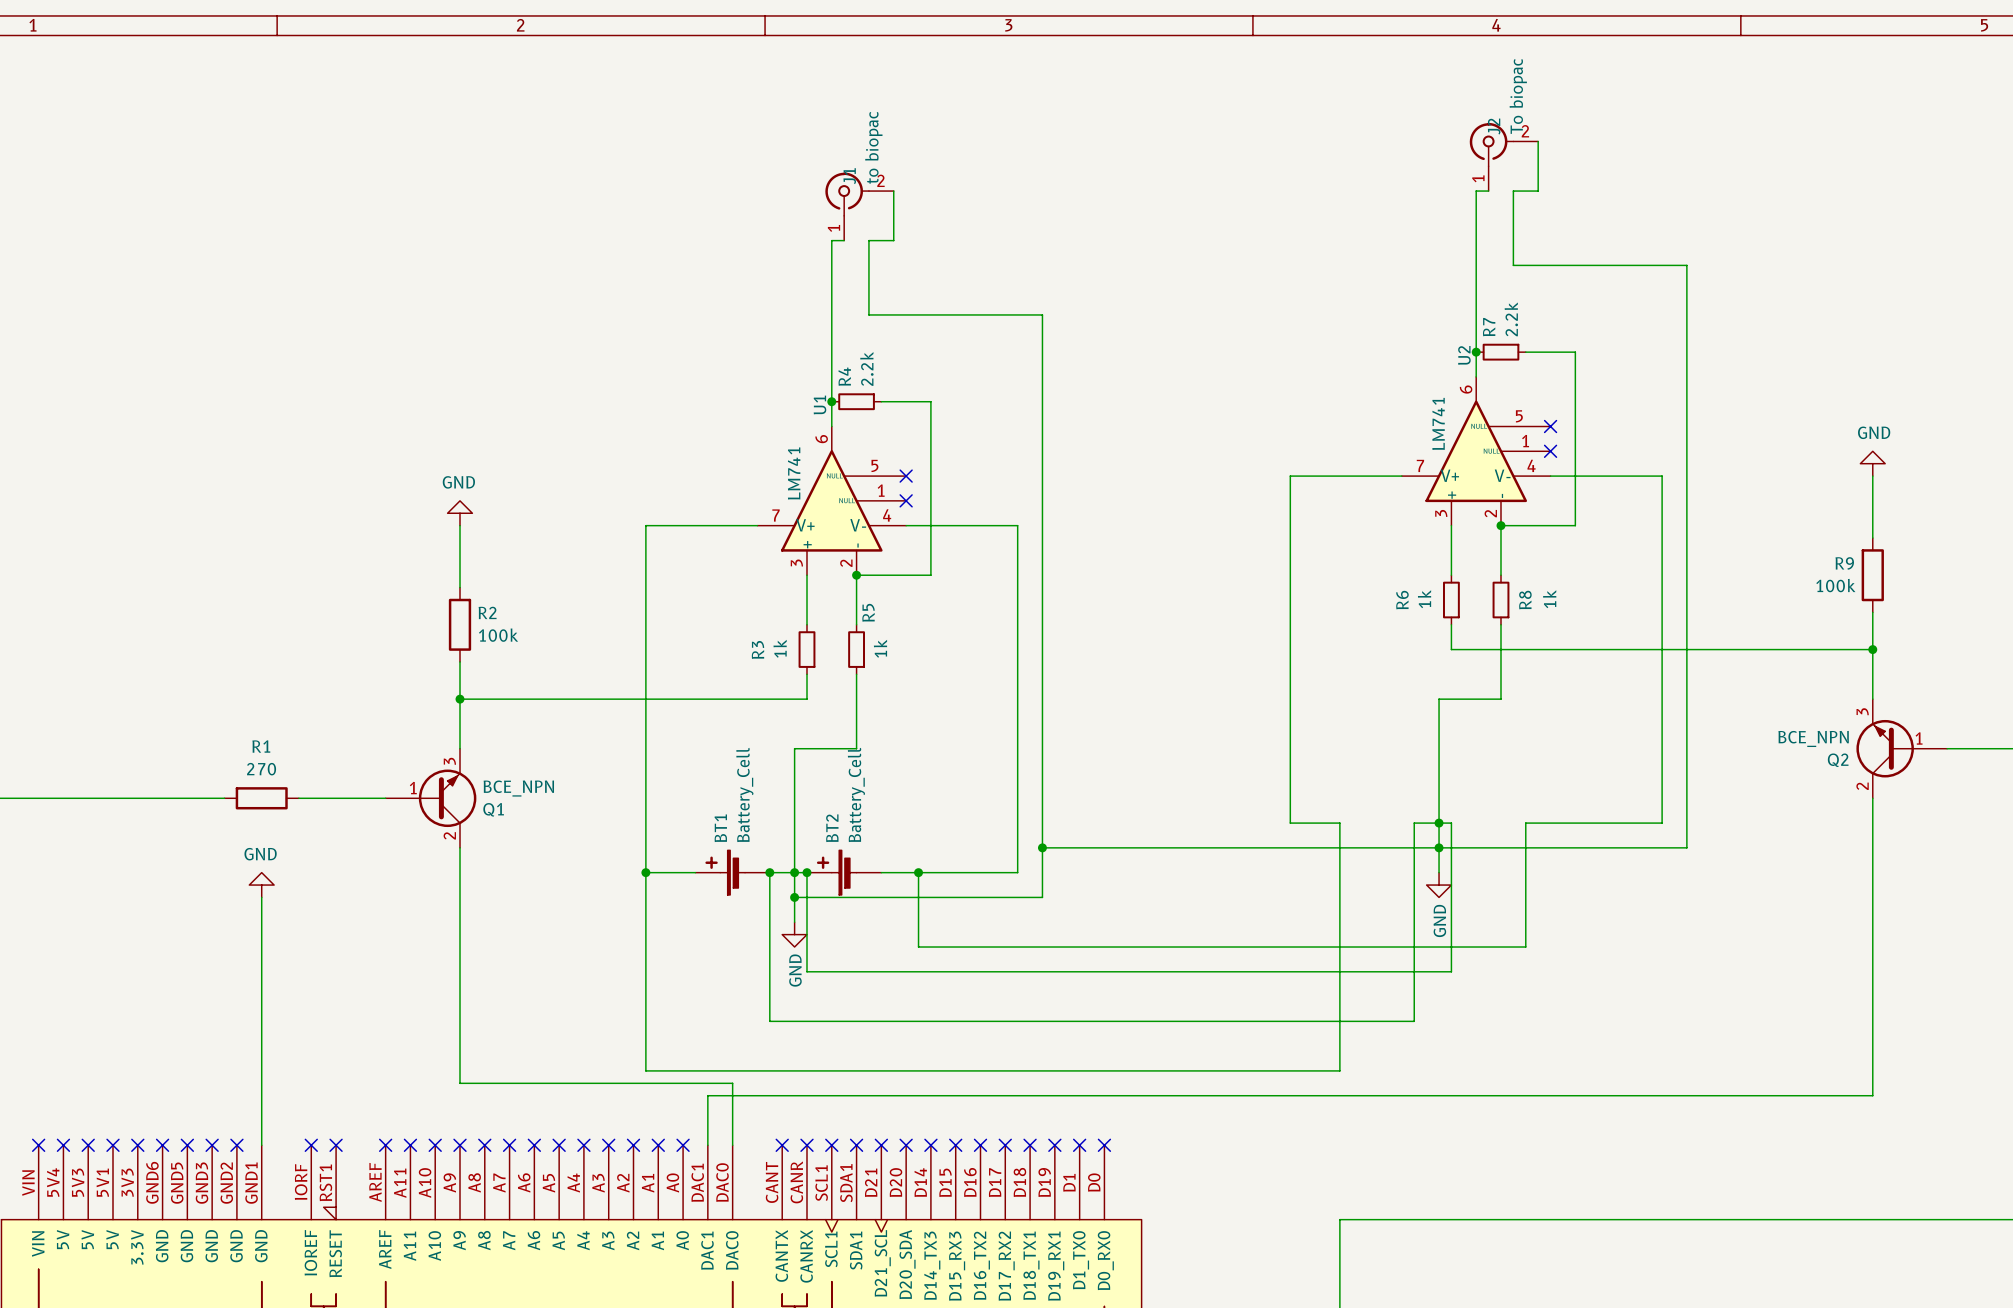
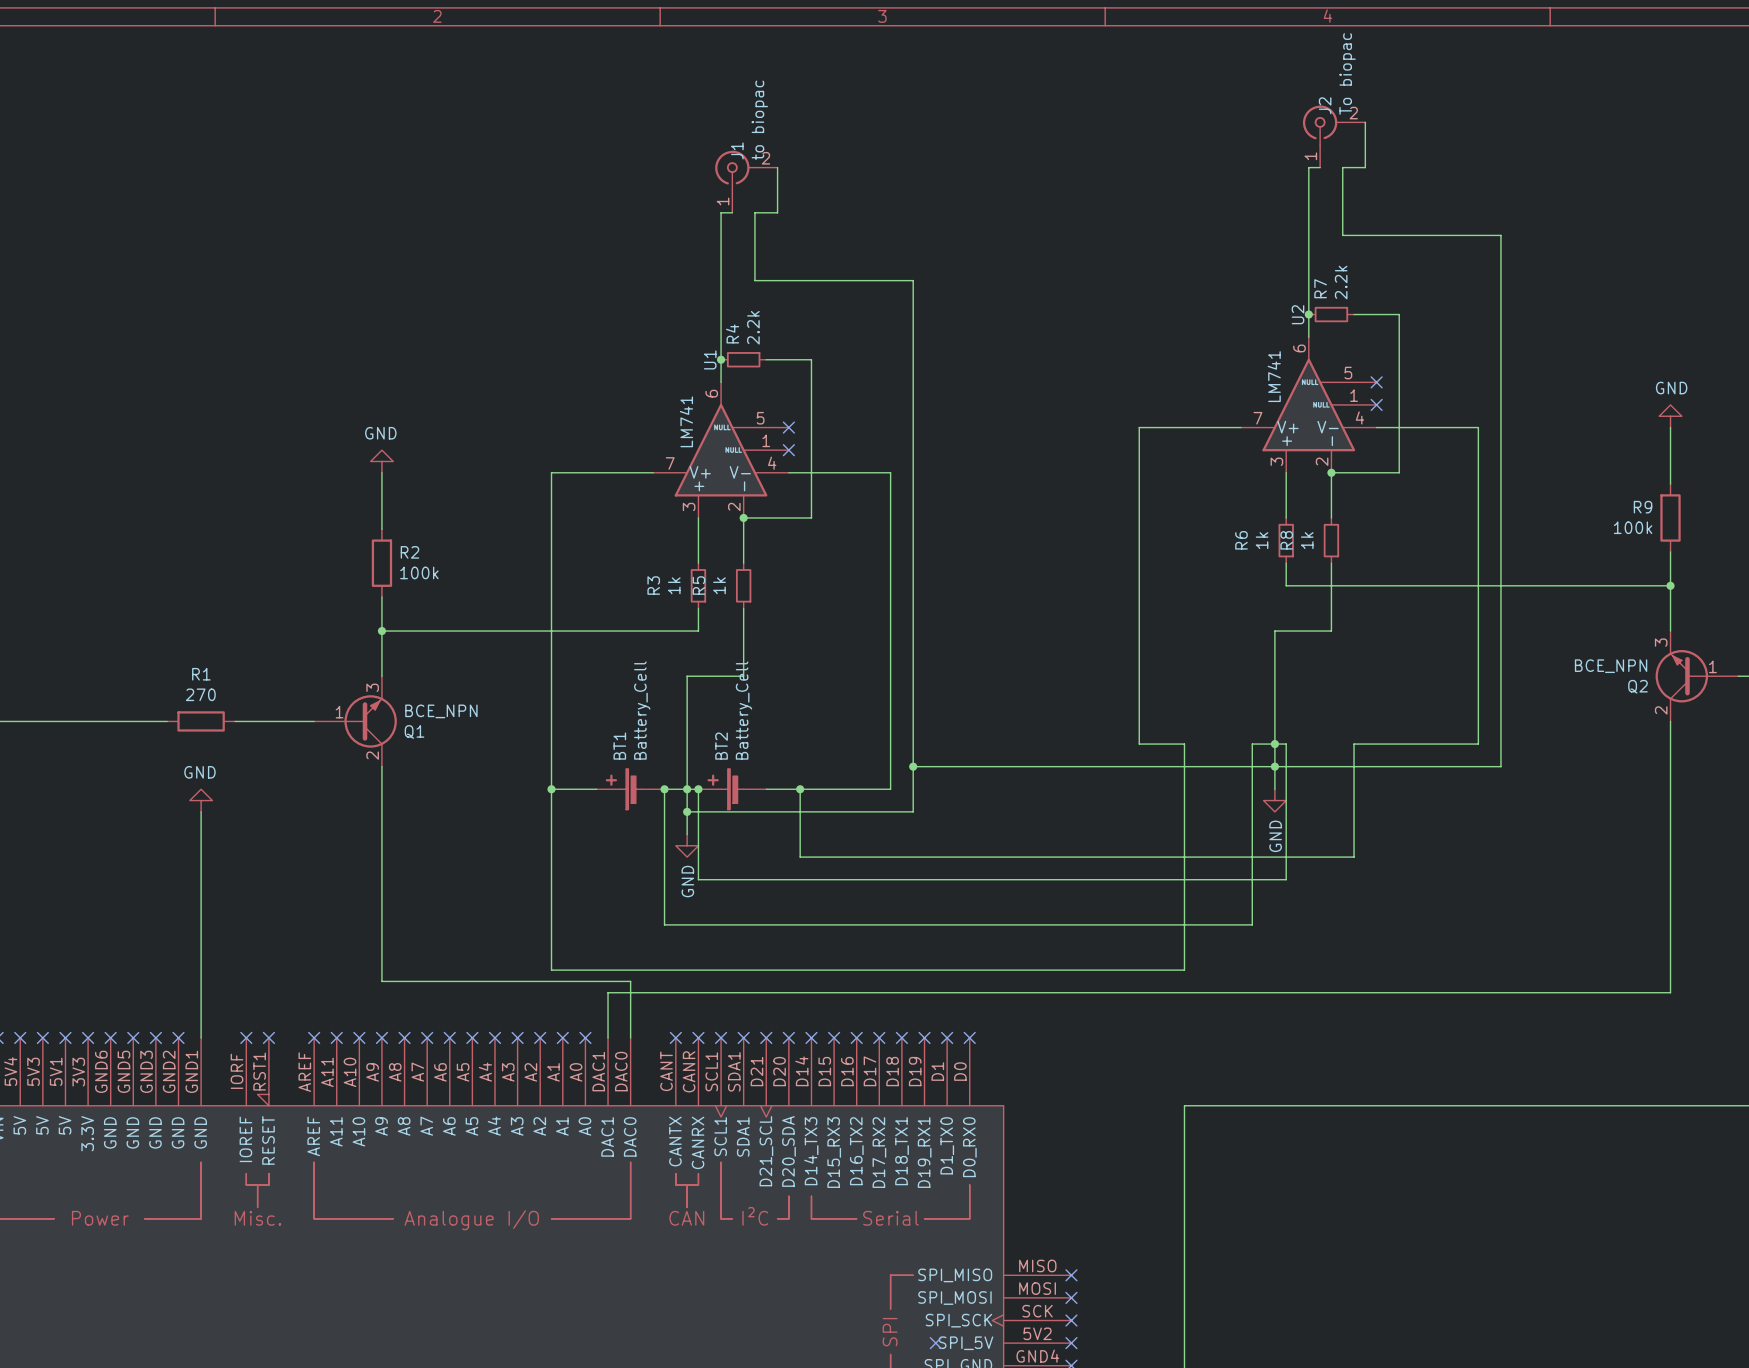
R8 value position: 1k (1549, 599) -> 1k (1307, 540)
R8 name position: R8 (1525, 600) -> R8 (1286, 540)
R5 name position: R5 (868, 612) -> R5 (698, 585)
R5 value position: 1k (880, 648) -> 1k (719, 585)

